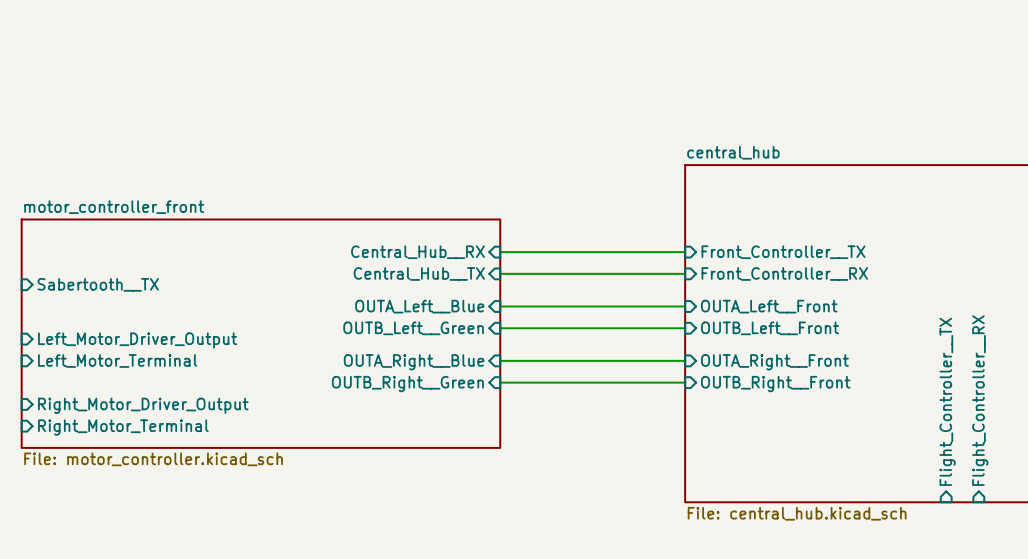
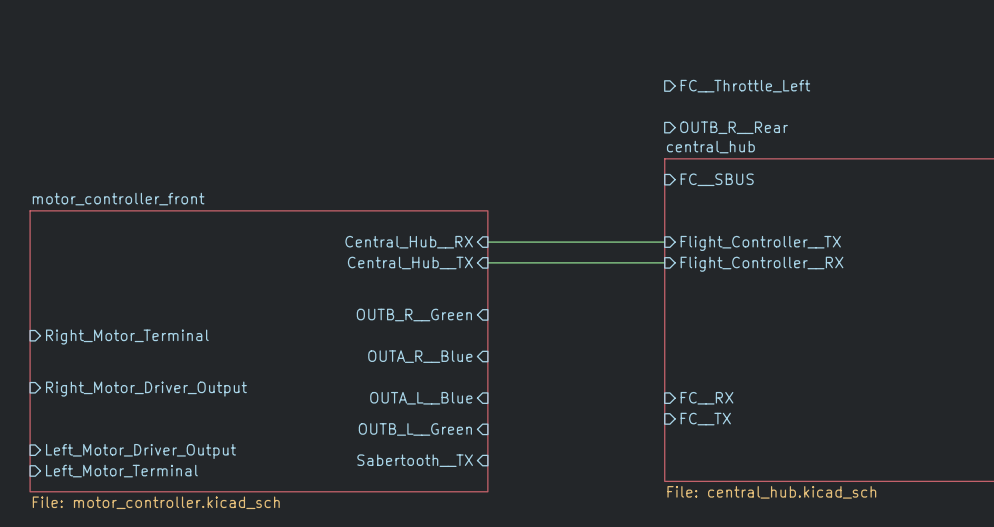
sheet pin: none -> FC__Throttle_Left (745, 86)
sheet pin: none -> OUTB_R__Rear (734, 127)
sheet pin: none -> FC__SBUS (717, 179)
sheet pin: Front_Controller__TX (783, 252) -> Flight_Controller__TX (760, 243)
sheet pin: Front_Controller__RX (784, 273) -> Flight_Controller__RX (762, 264)
sheet pin: Sabertooth__TX (98, 284) -> none
sheet pin: OUTA_Left__Blue (419, 306) -> none
wire: (500, 306) (685, 306) -> none
sheet pin: OUTA_Left__Front (769, 306) -> none
sheet pin: OUTB_Left__Green (413, 328) -> OUTB_R__Green (414, 315)
wire: (500, 328) (685, 328) -> none
sheet pin: OUTB_Left__Front (770, 328) -> none
sheet motor_controller_front: File: motor_controller.kicad_sch (260, 333) -> none
sheet pin position: Left_Motor_Driver_Output (137, 340) -> Left_Motor_Driver_Output (140, 451)
sheet pin position: Left_Motor_Terminal (117, 360) -> Left_Motor_Terminal (121, 471)
wire: (500, 360) (685, 360) -> none
sheet pin: OUTA_Right__Blue (414, 362) -> OUTA_R__Blue (420, 356)
sheet pin: OUTA_Right__Front (774, 362) -> none
sheet motor_controller_front: none -> File: motor_controller.kicad_sch (258, 351)
wire: (500, 382) (685, 382) -> none
sheet pin: OUTB_Right__Green (407, 384) -> none
sheet pin: OUTB_Right__Front (775, 384) -> none
sheet pin: Flight_Controller__RX (980, 400) -> none
sheet pin: Flight_Controller__TX (947, 401) -> none
sheet pin: none -> OUTA_L__Blue (421, 398)
sheet pin: none -> FC__RX (707, 398)
sheet pin position: Right_Motor_Terminal (123, 427) -> Right_Motor_Terminal (127, 337)
sheet pin: none -> FC__TX (705, 419)
sheet pin: none -> OUTB_L__Green (415, 429)
sheet pin: none -> Sabertooth__TX (415, 460)

